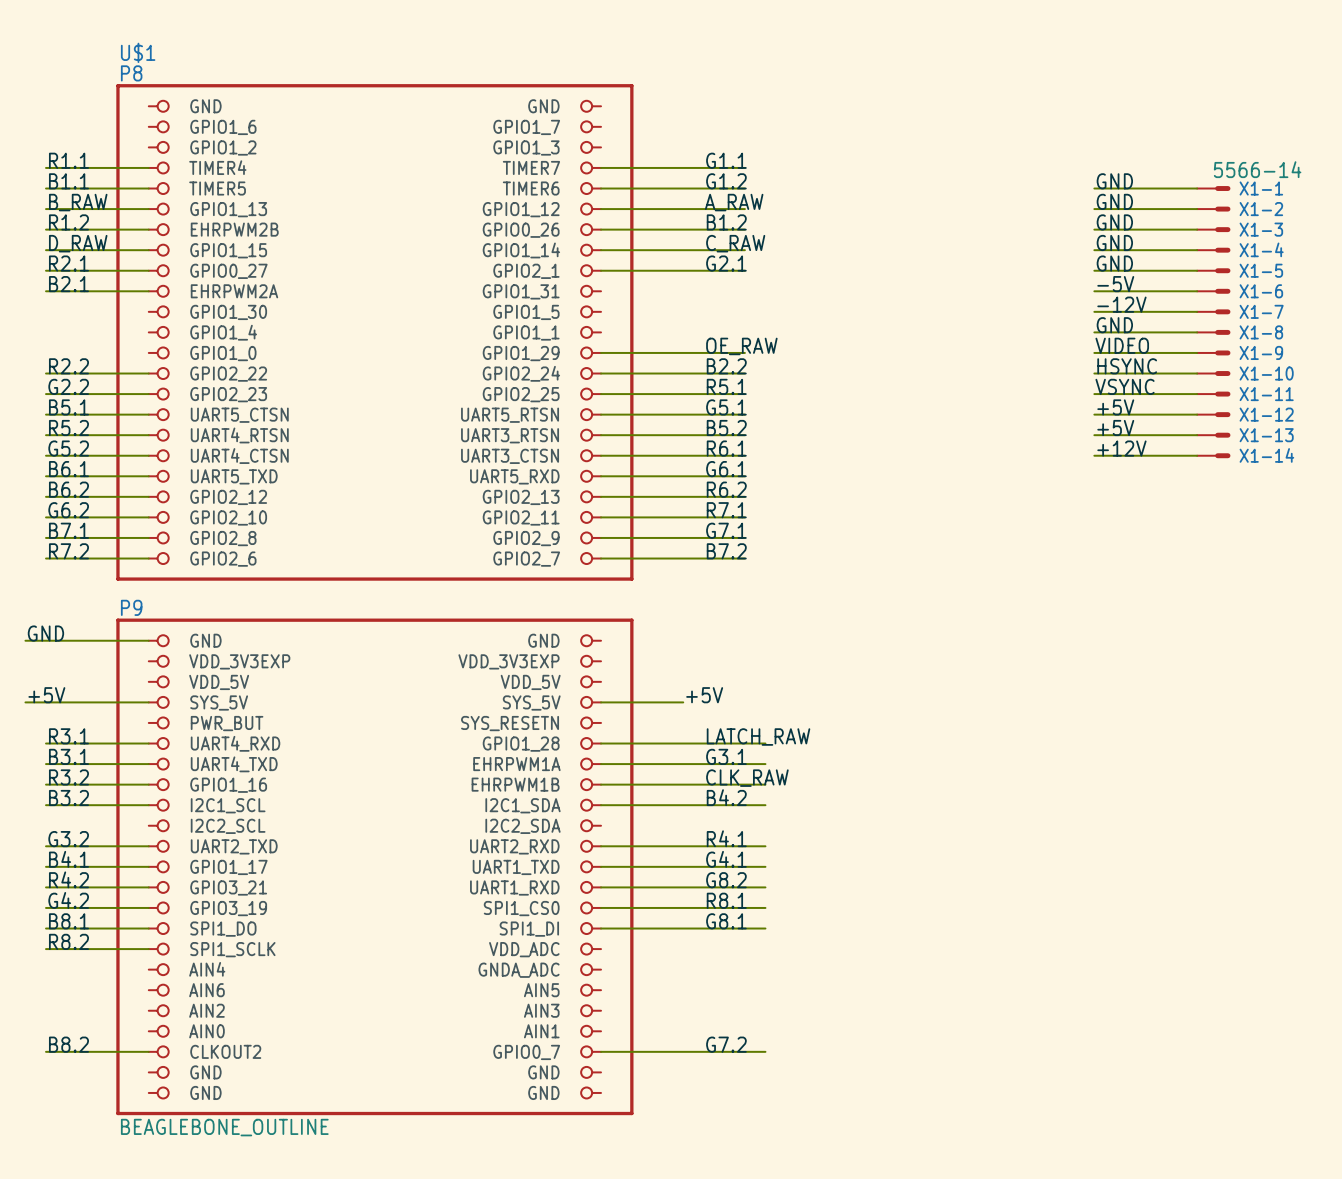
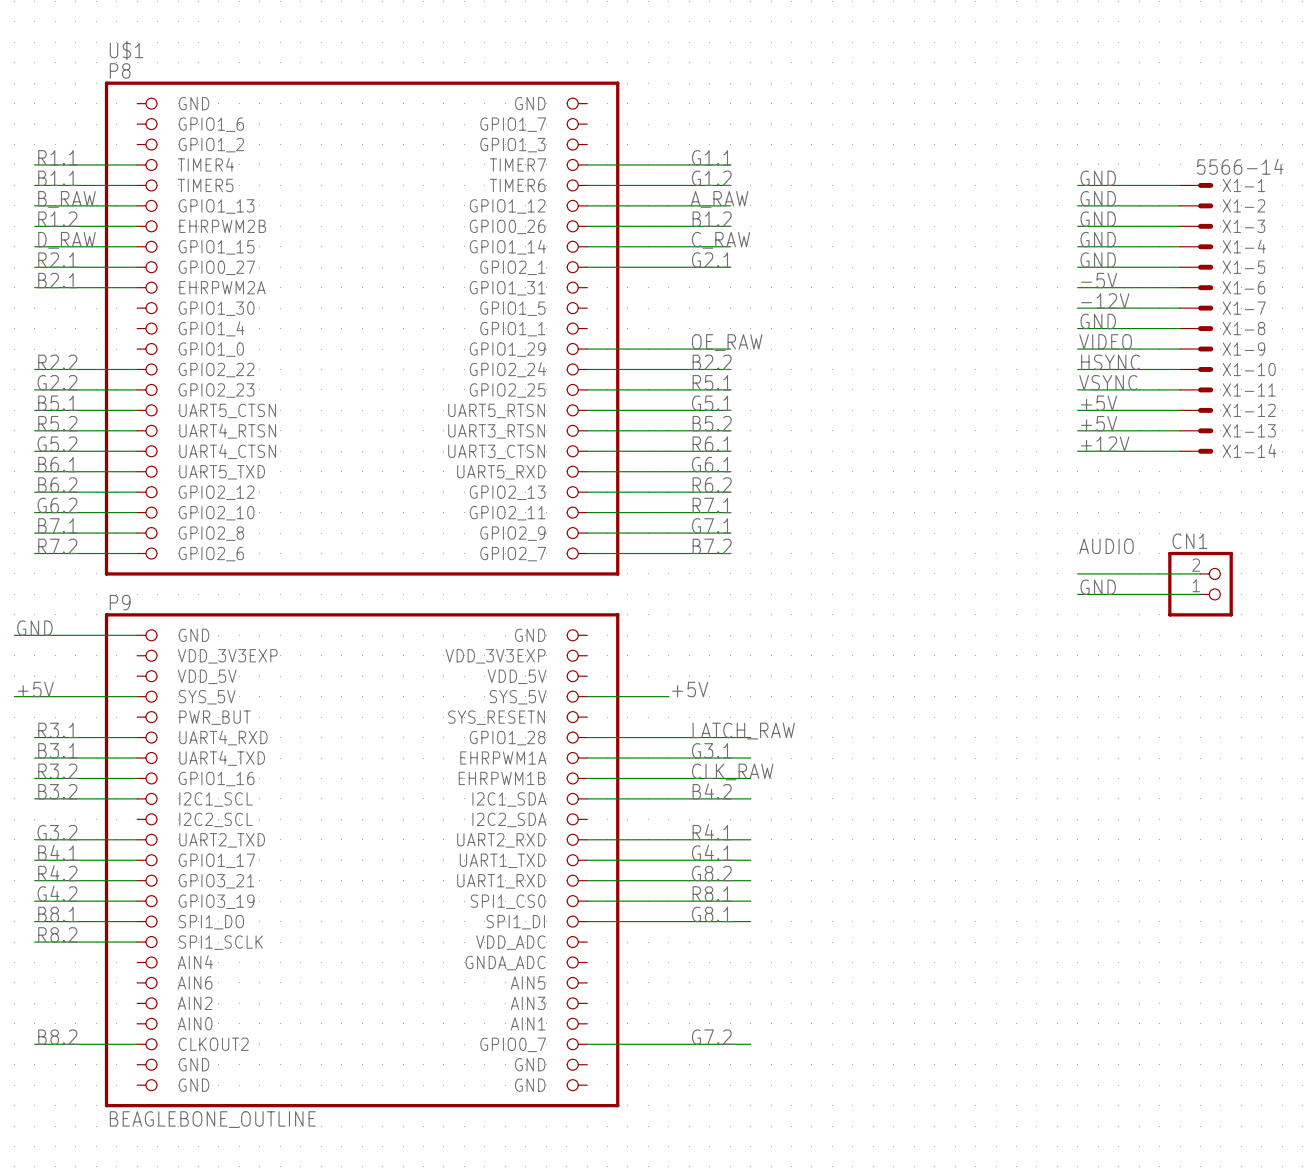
label: none -> AUDIO (1106, 546)
wire: none -> (1077, 573) (1200, 573)
CN1: none -> (1200, 584)
label: none -> GND (1098, 587)
wire: none -> (1077, 594) (1200, 594)

